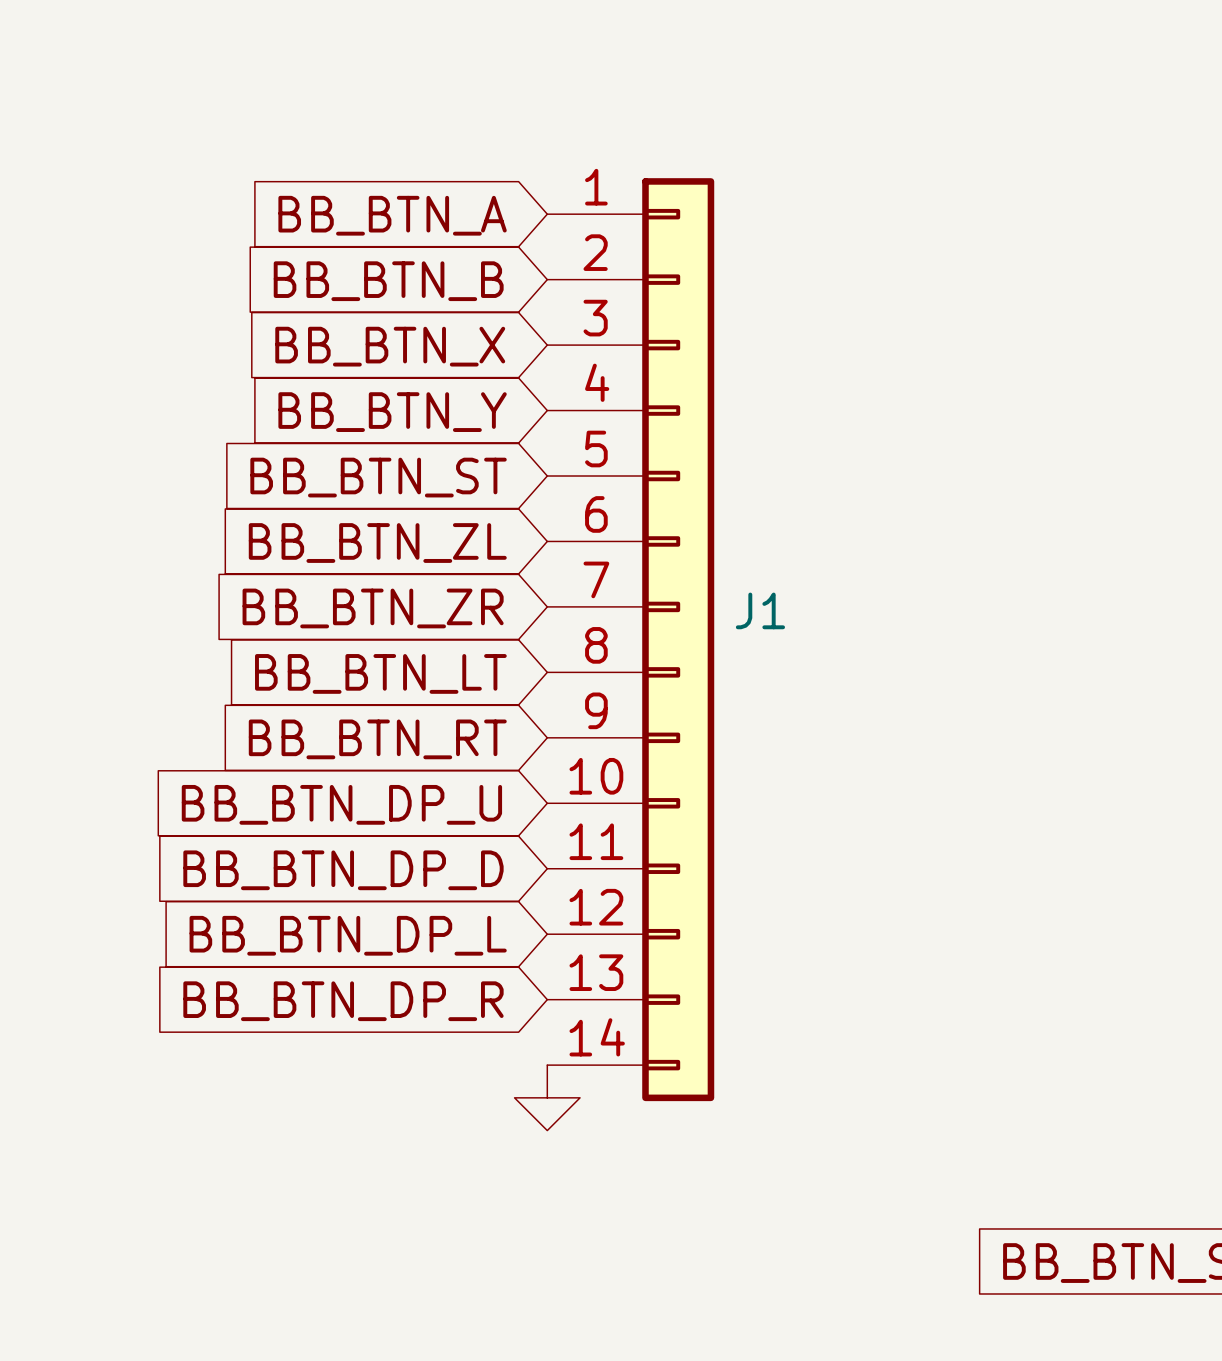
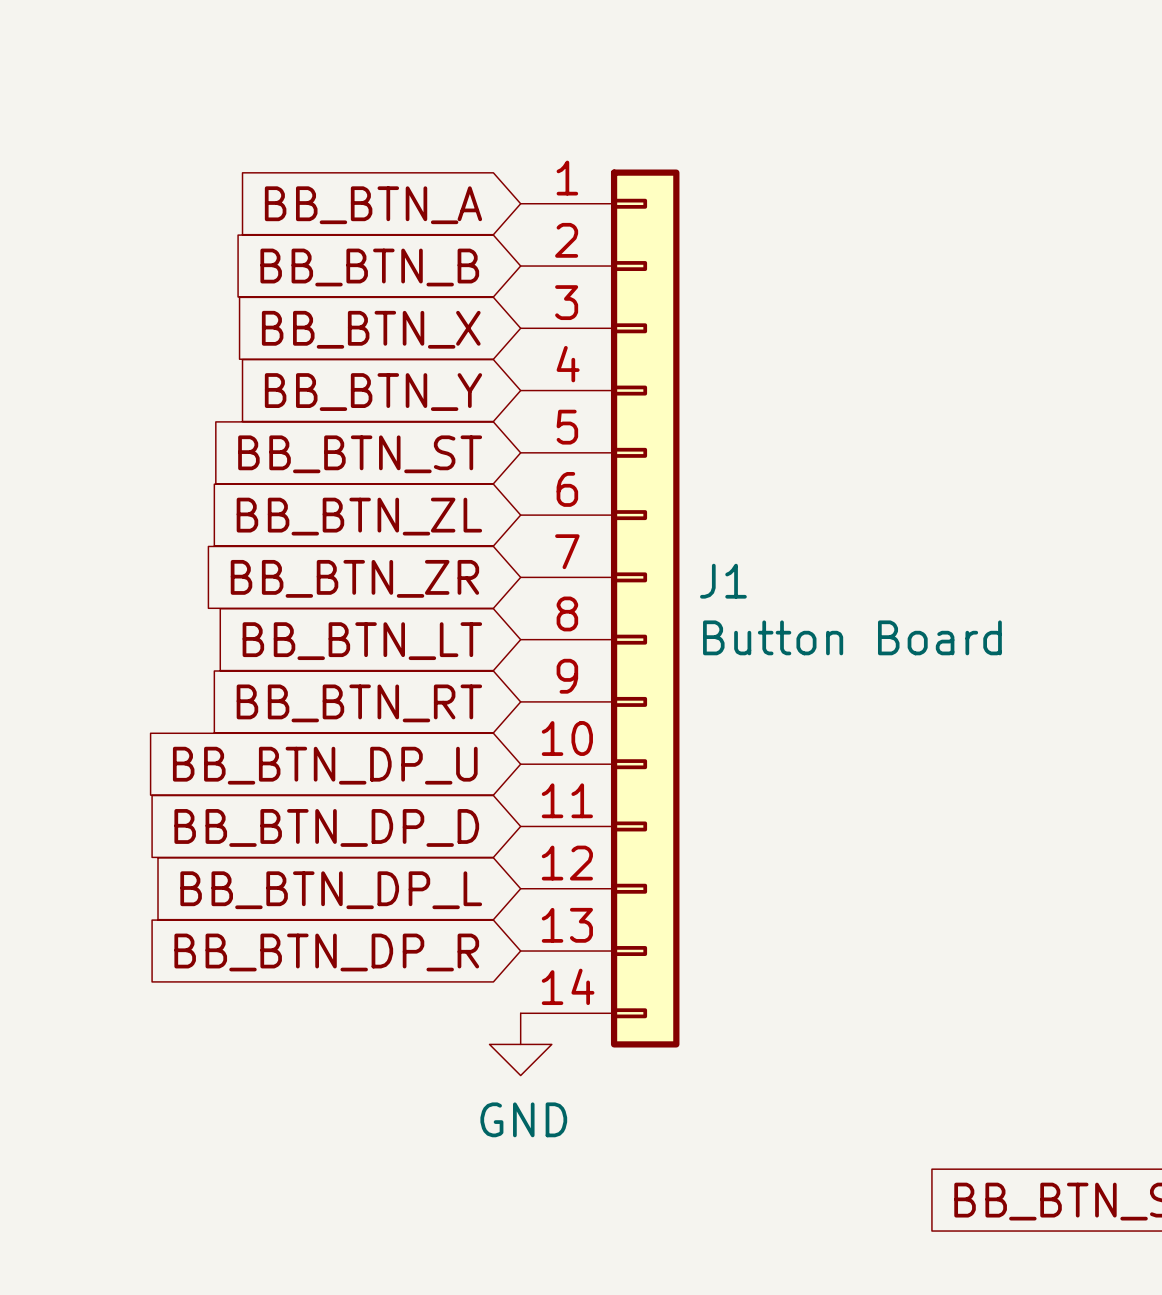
J1 value: none -> Button Board (852, 637)
power symbol text: none -> GND (523, 1119)

